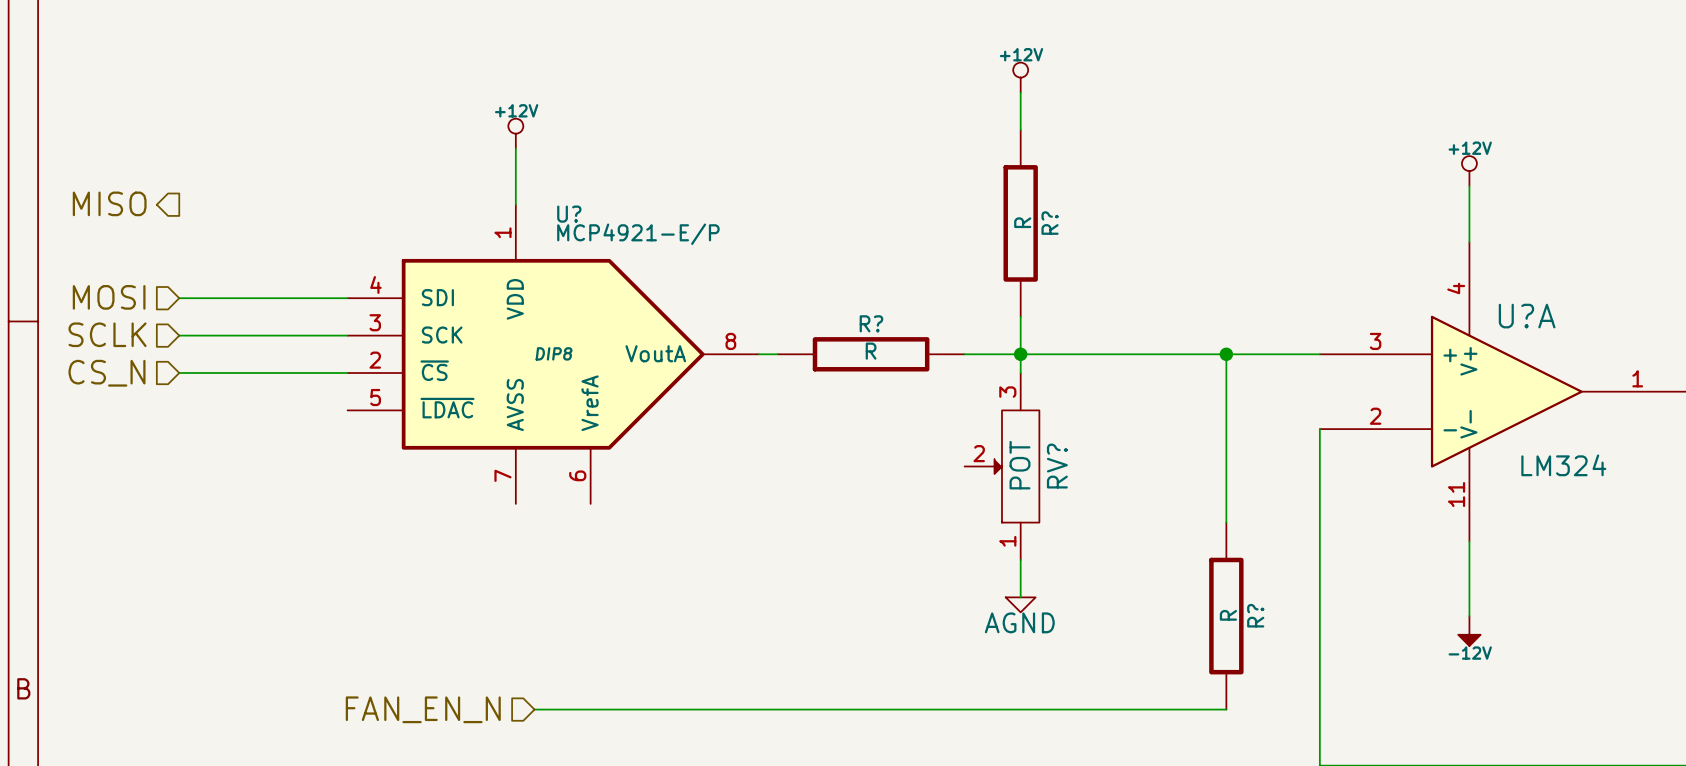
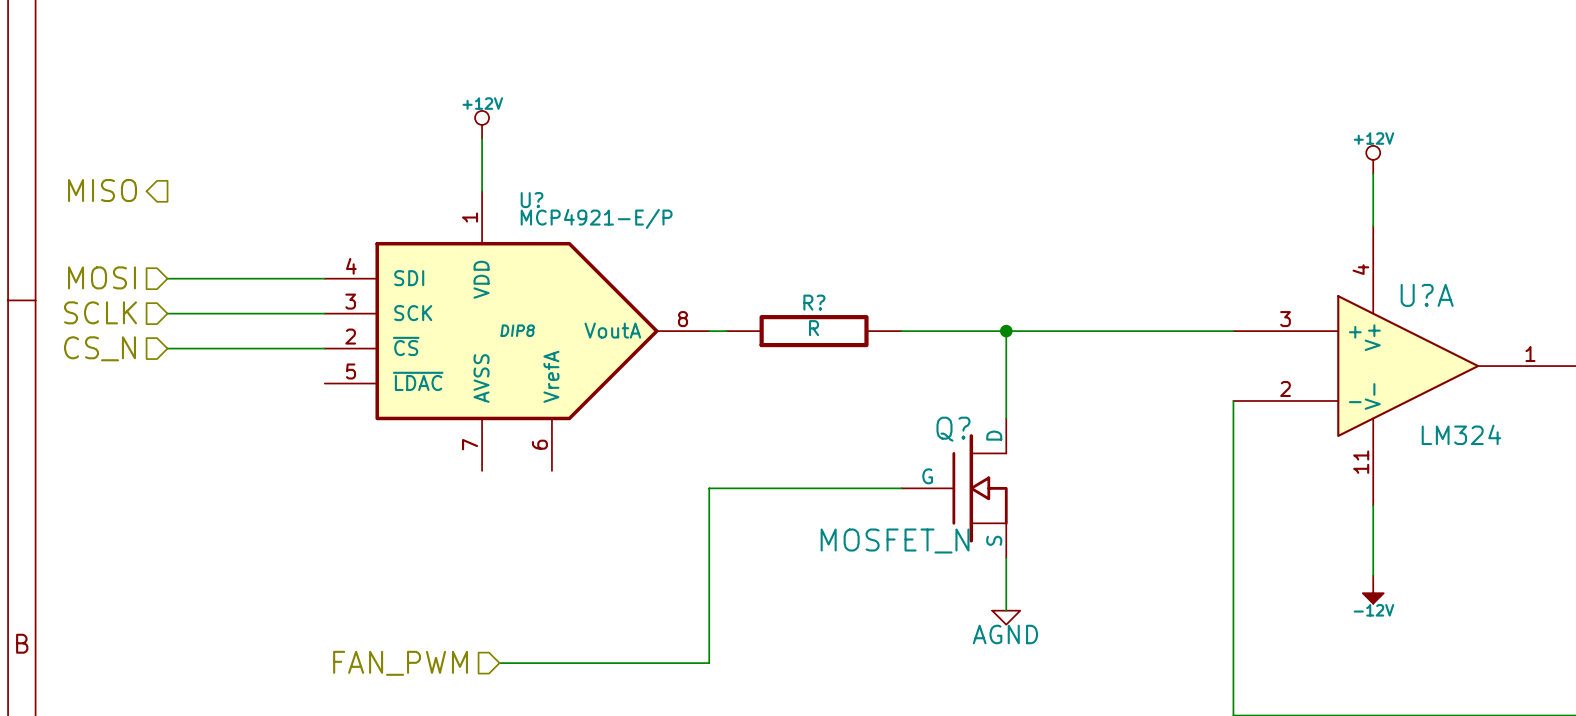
power symbol: +12V (1020, 77) -> none
wire: (1020, 92) (1020, 129) -> none
R?: R (1020, 223) -> none
wire: (1020, 316) (1020, 373) -> (1006, 558) (1006, 610)
junction position: (1020, 354) -> (1006, 331)
wire: none -> (1006, 331) (1006, 418)
wire: (1226, 354) (1226, 522) -> none
junction: (1226, 354) -> none
RV?: POT (1001, 466) -> none
Q?: none -> MOSFET_N (954, 488)
wire: (1020, 559) (1020, 597) -> none
power symbol position: AGND (1020, 604) -> AGND (1006, 617)
R?: R (1226, 616) -> none
hierarchical label: FAN_EN_N (423, 709) -> FAN_PWM (400, 663)
wire: (758, 709) (1226, 709) -> (709, 663) (709, 488) (901, 488)

